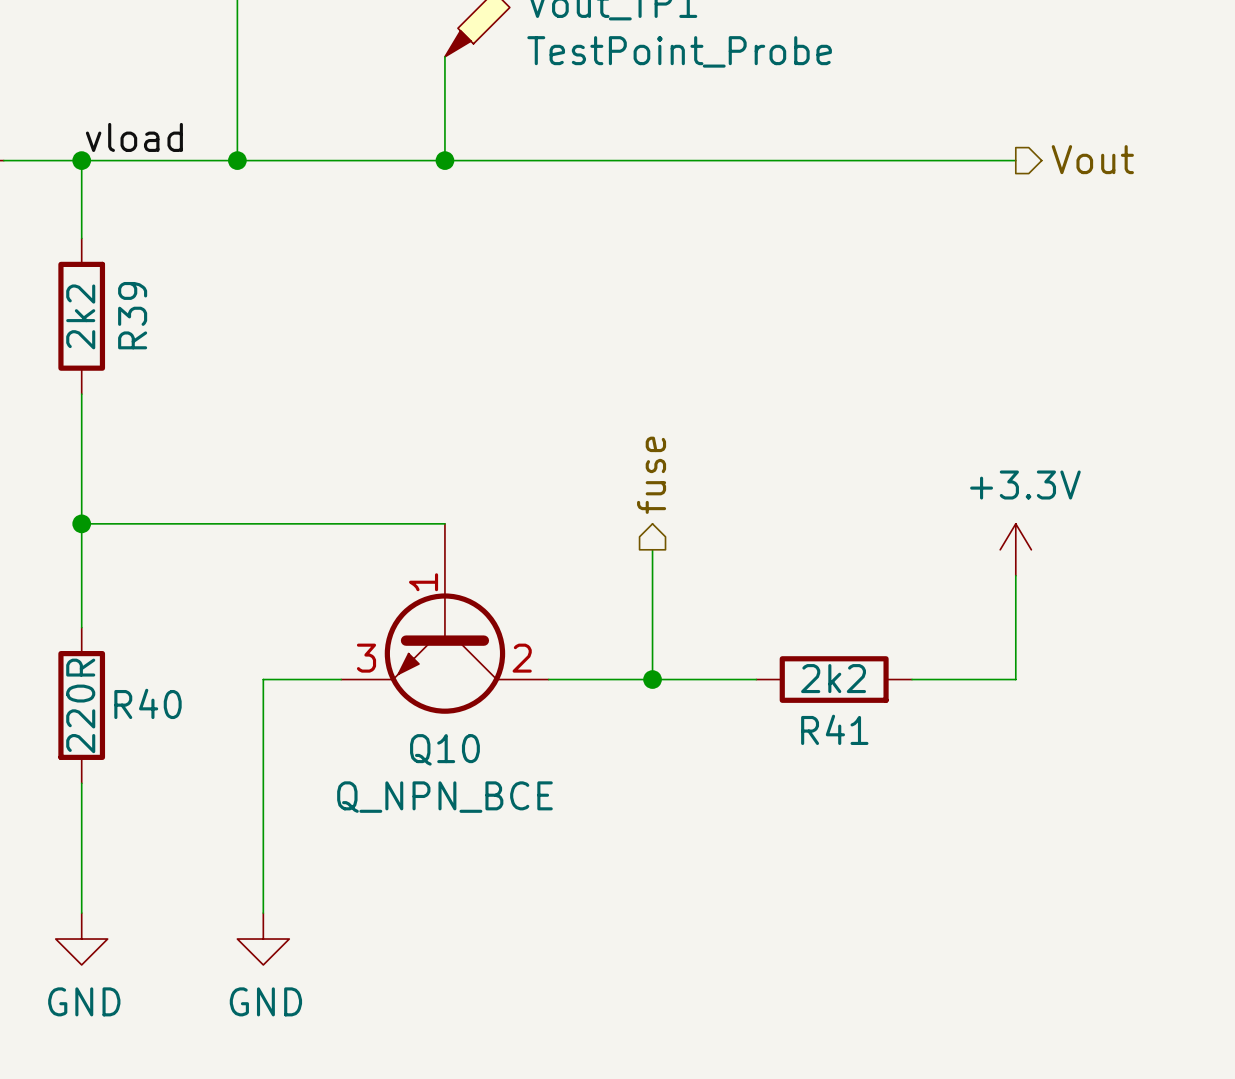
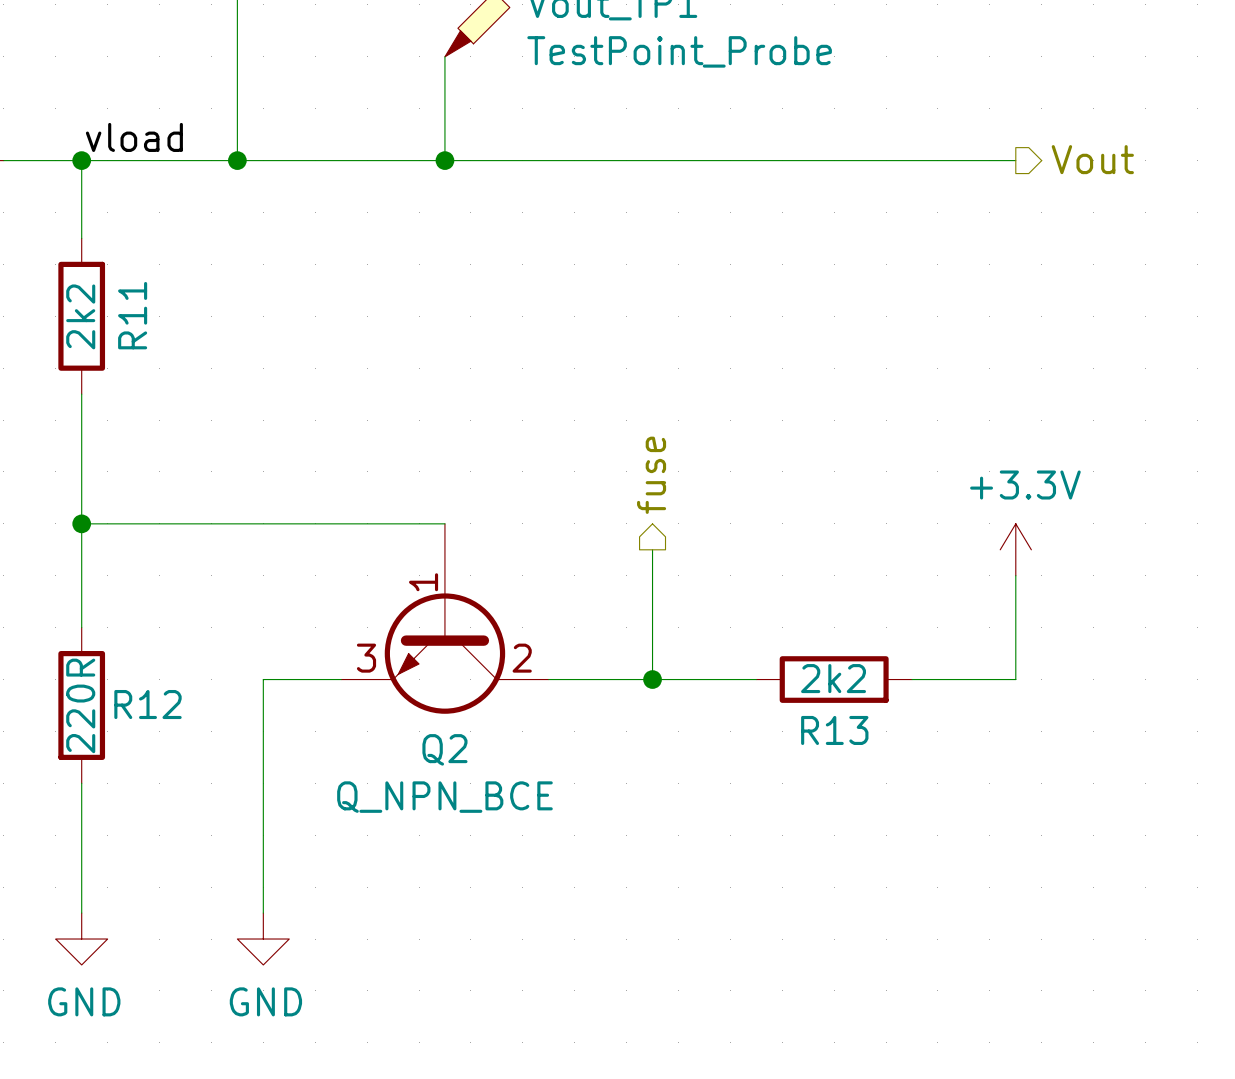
R39 name: R39 (132, 315) -> R11 (132, 315)
R40 name: R40 (147, 703) -> R12 (147, 704)
R41 name: R41 (834, 729) -> R13 (834, 730)
Q10 name: Q10 (444, 749) -> Q2 (444, 749)

